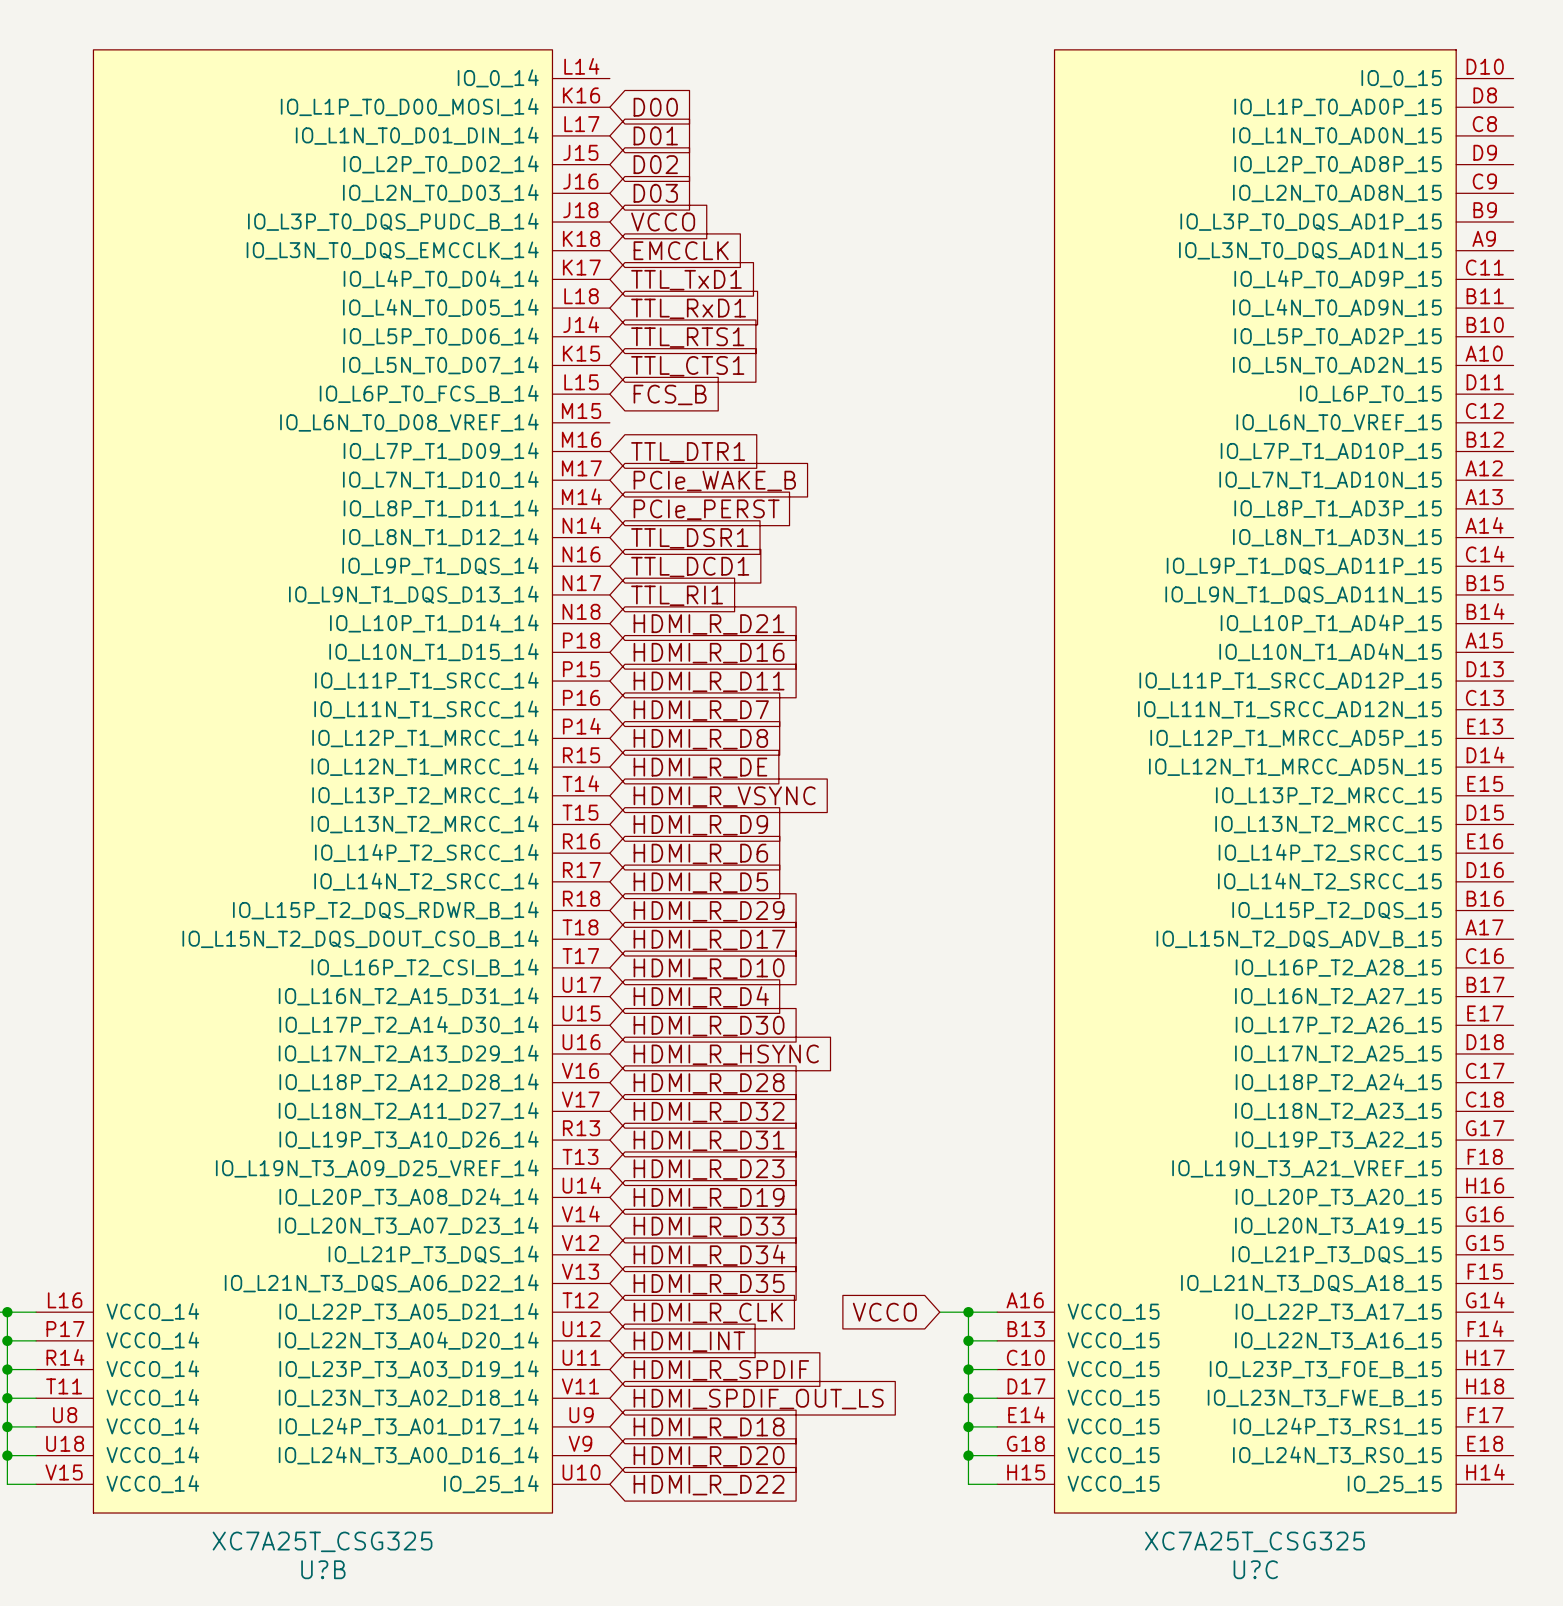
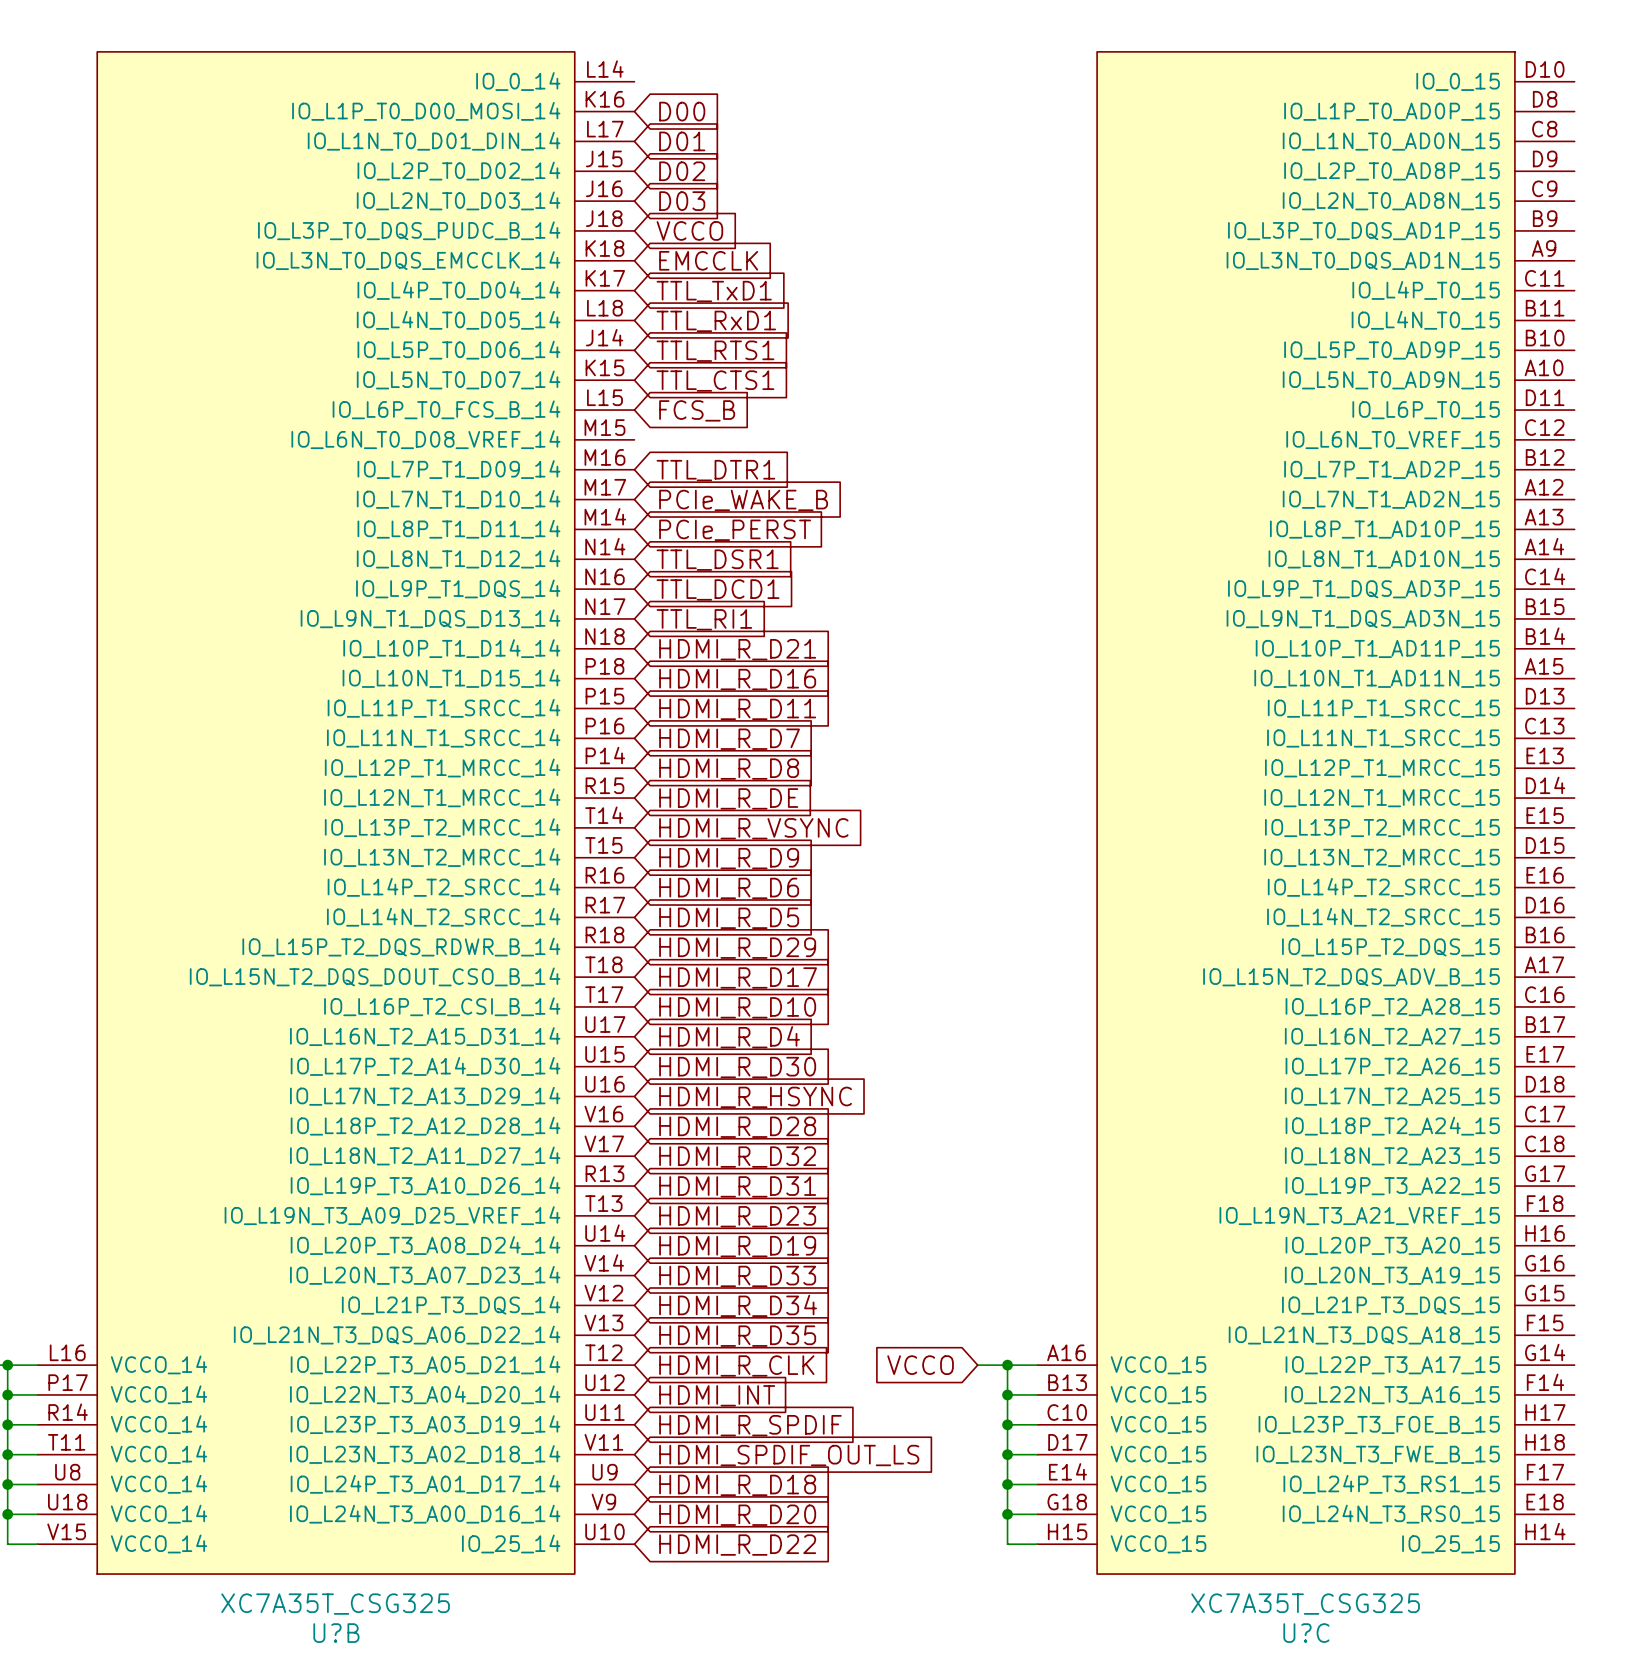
U?C symbol: [997, 49, 1514, 1514] -> [1037, 51, 1575, 1575]
U?B value: XC7A25T_CSG325 (322, 1541) -> XC7A35T_CSG325 (335, 1604)
U?C value: XC7A25T_CSG325 (1254, 1541) -> XC7A35T_CSG325 (1305, 1604)

